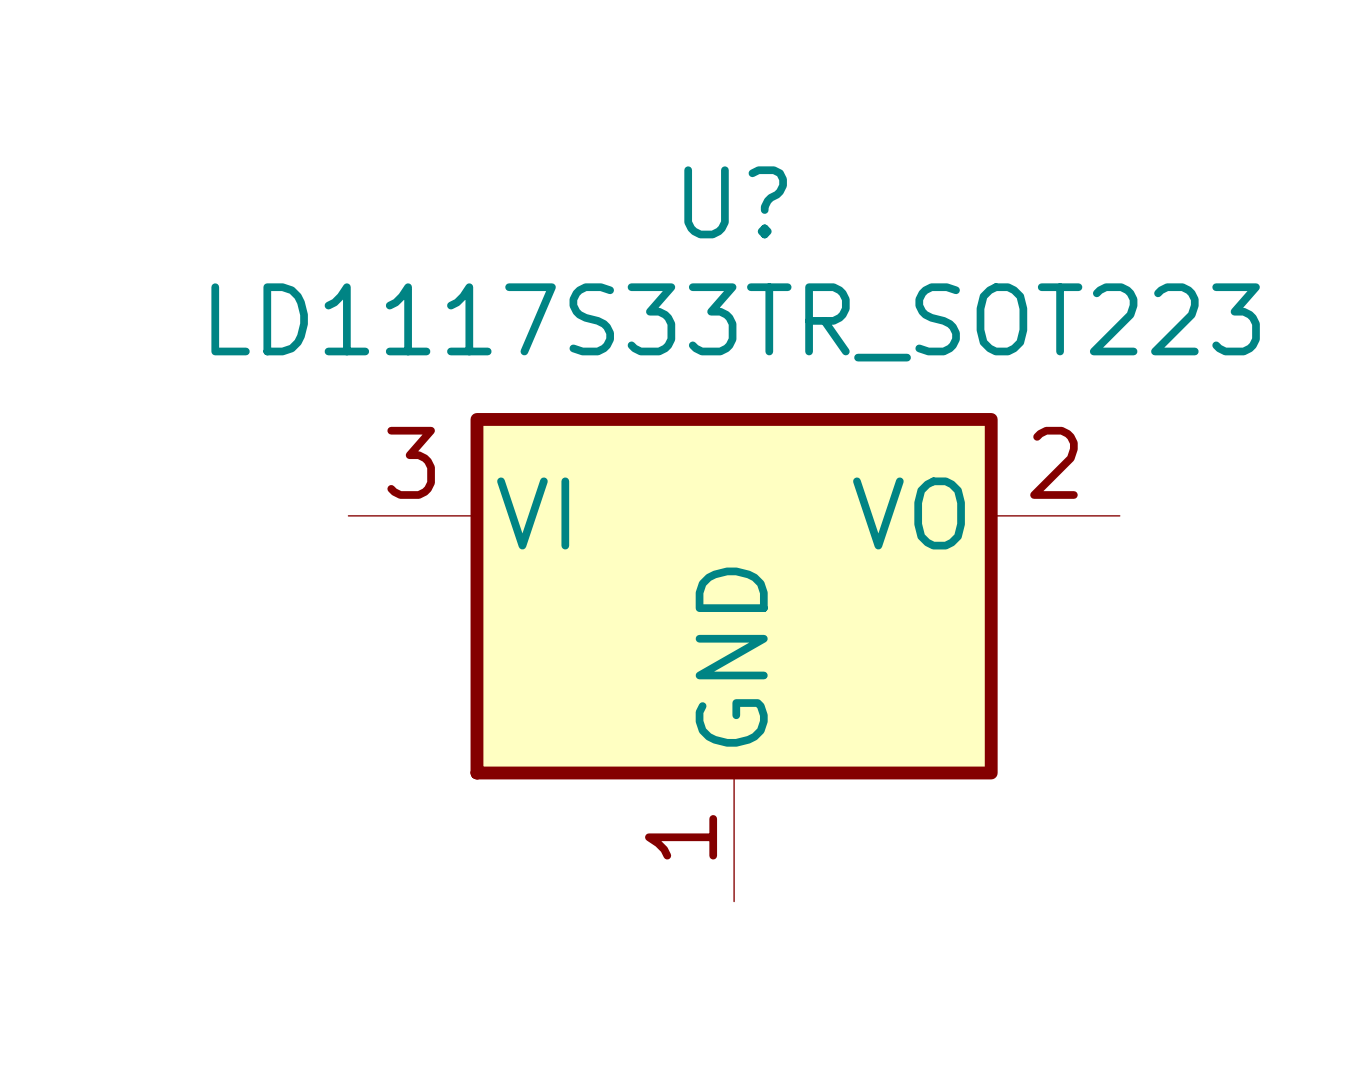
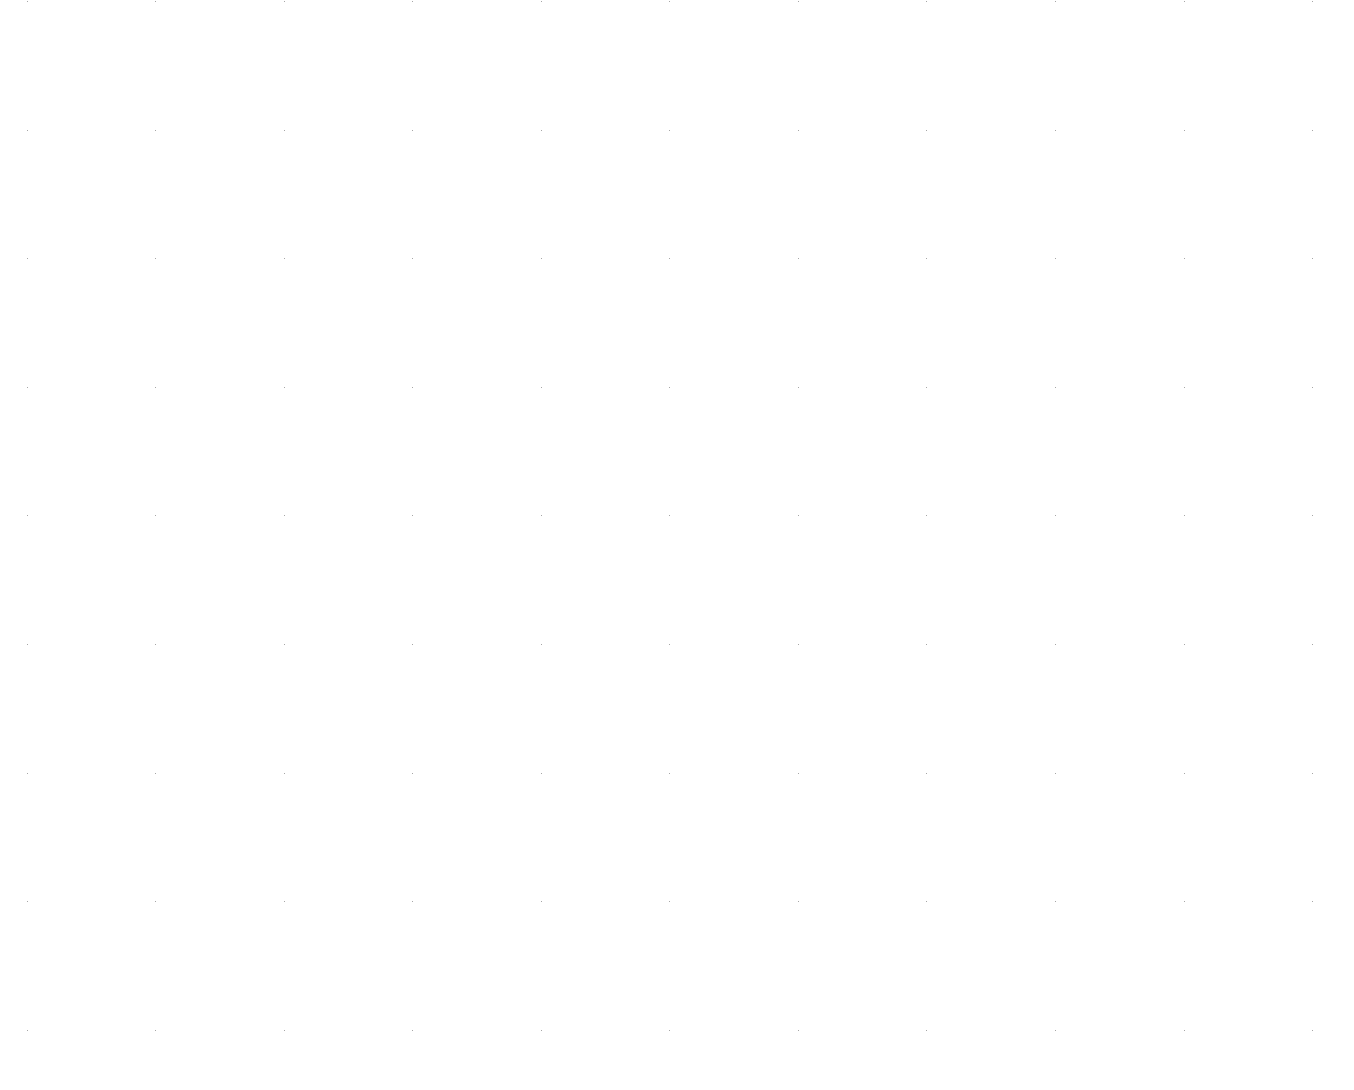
U?: LD1117S33TR_SOT223 (734, 657) -> none

